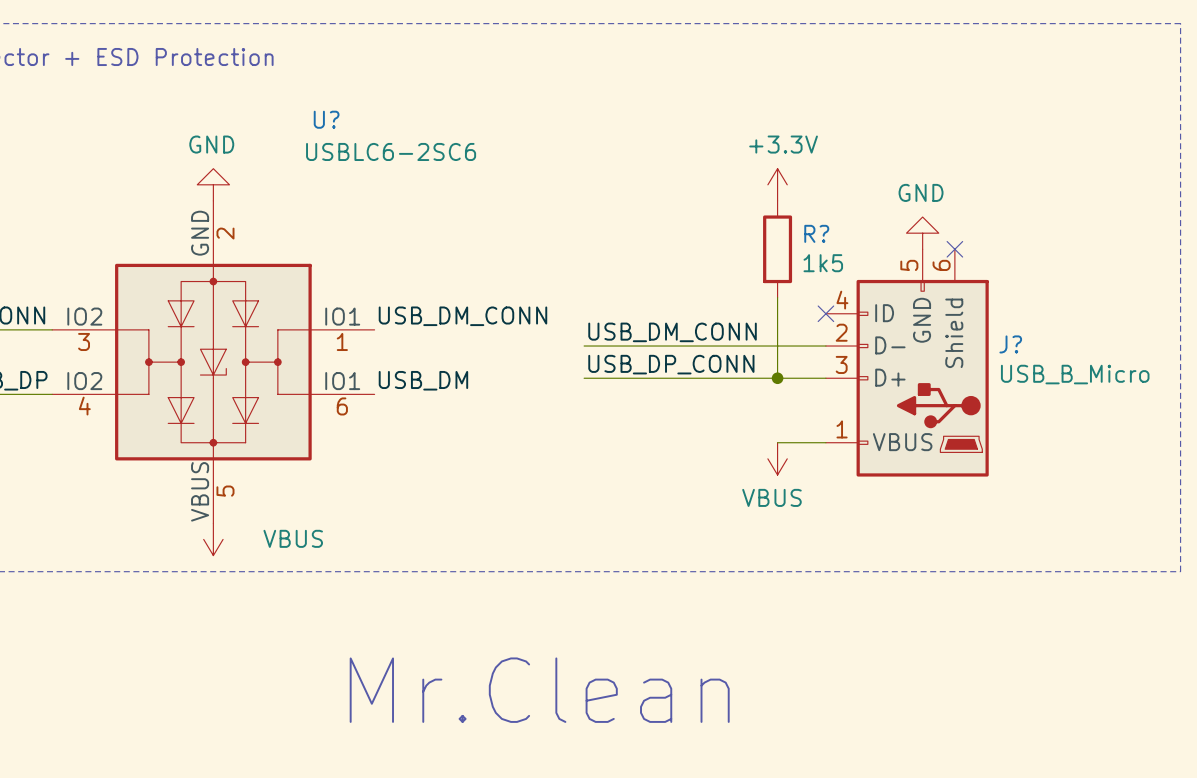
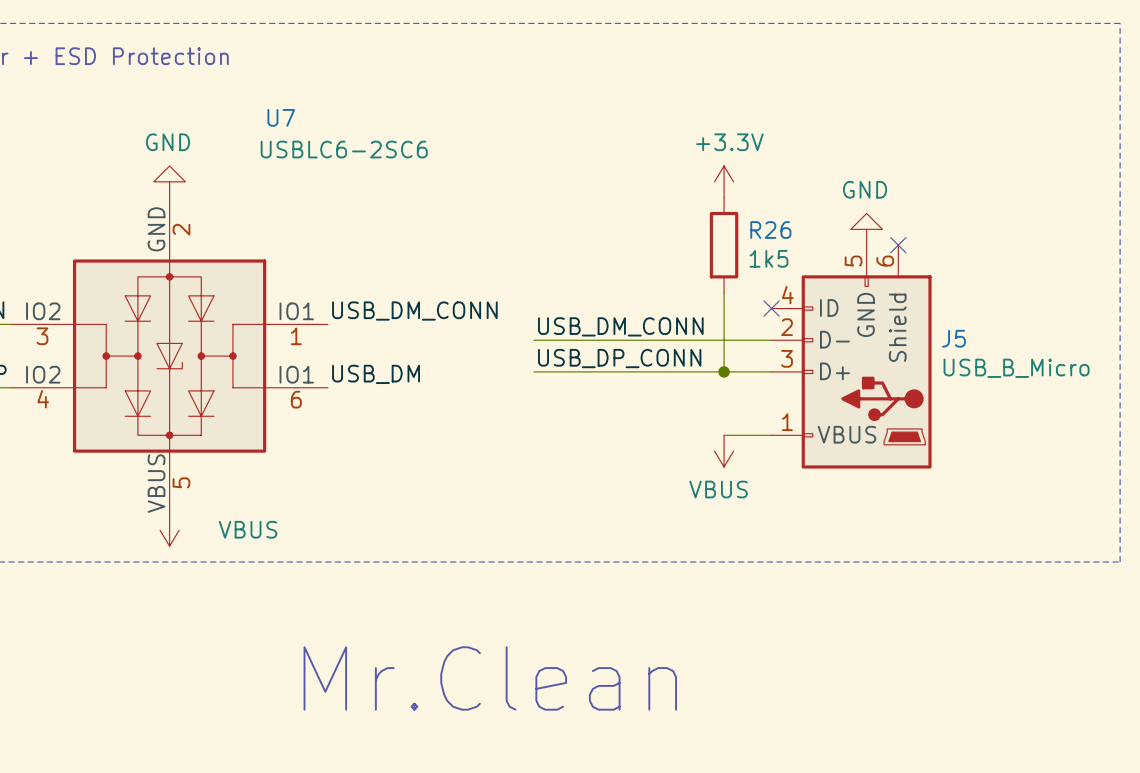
U? name: U? (326, 119) -> U7 (281, 117)
R? name: R? (816, 233) -> R26 (770, 230)
J? name: J? (1010, 344) -> J5 (953, 338)

